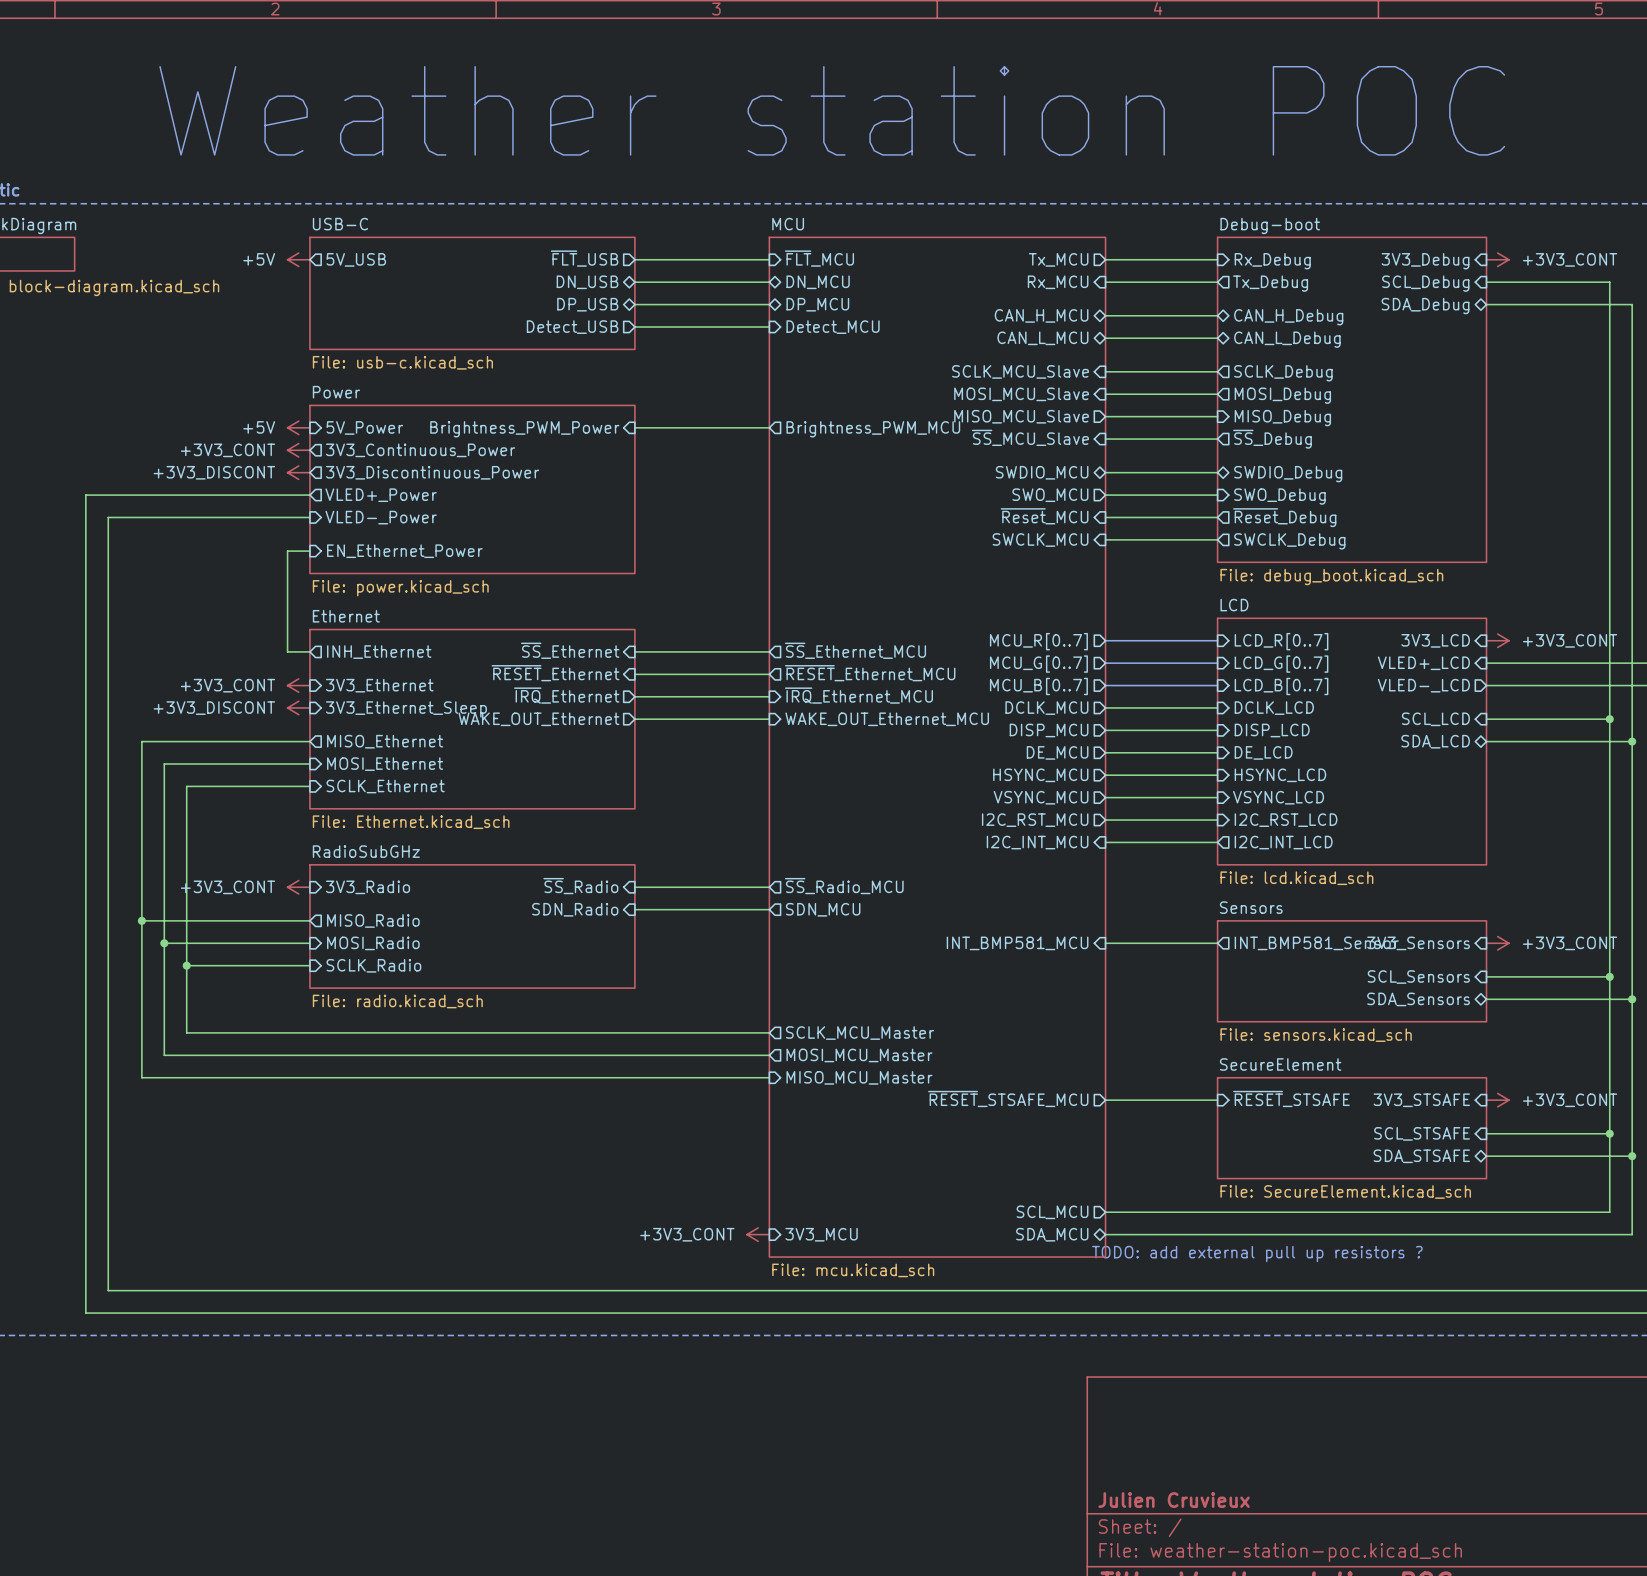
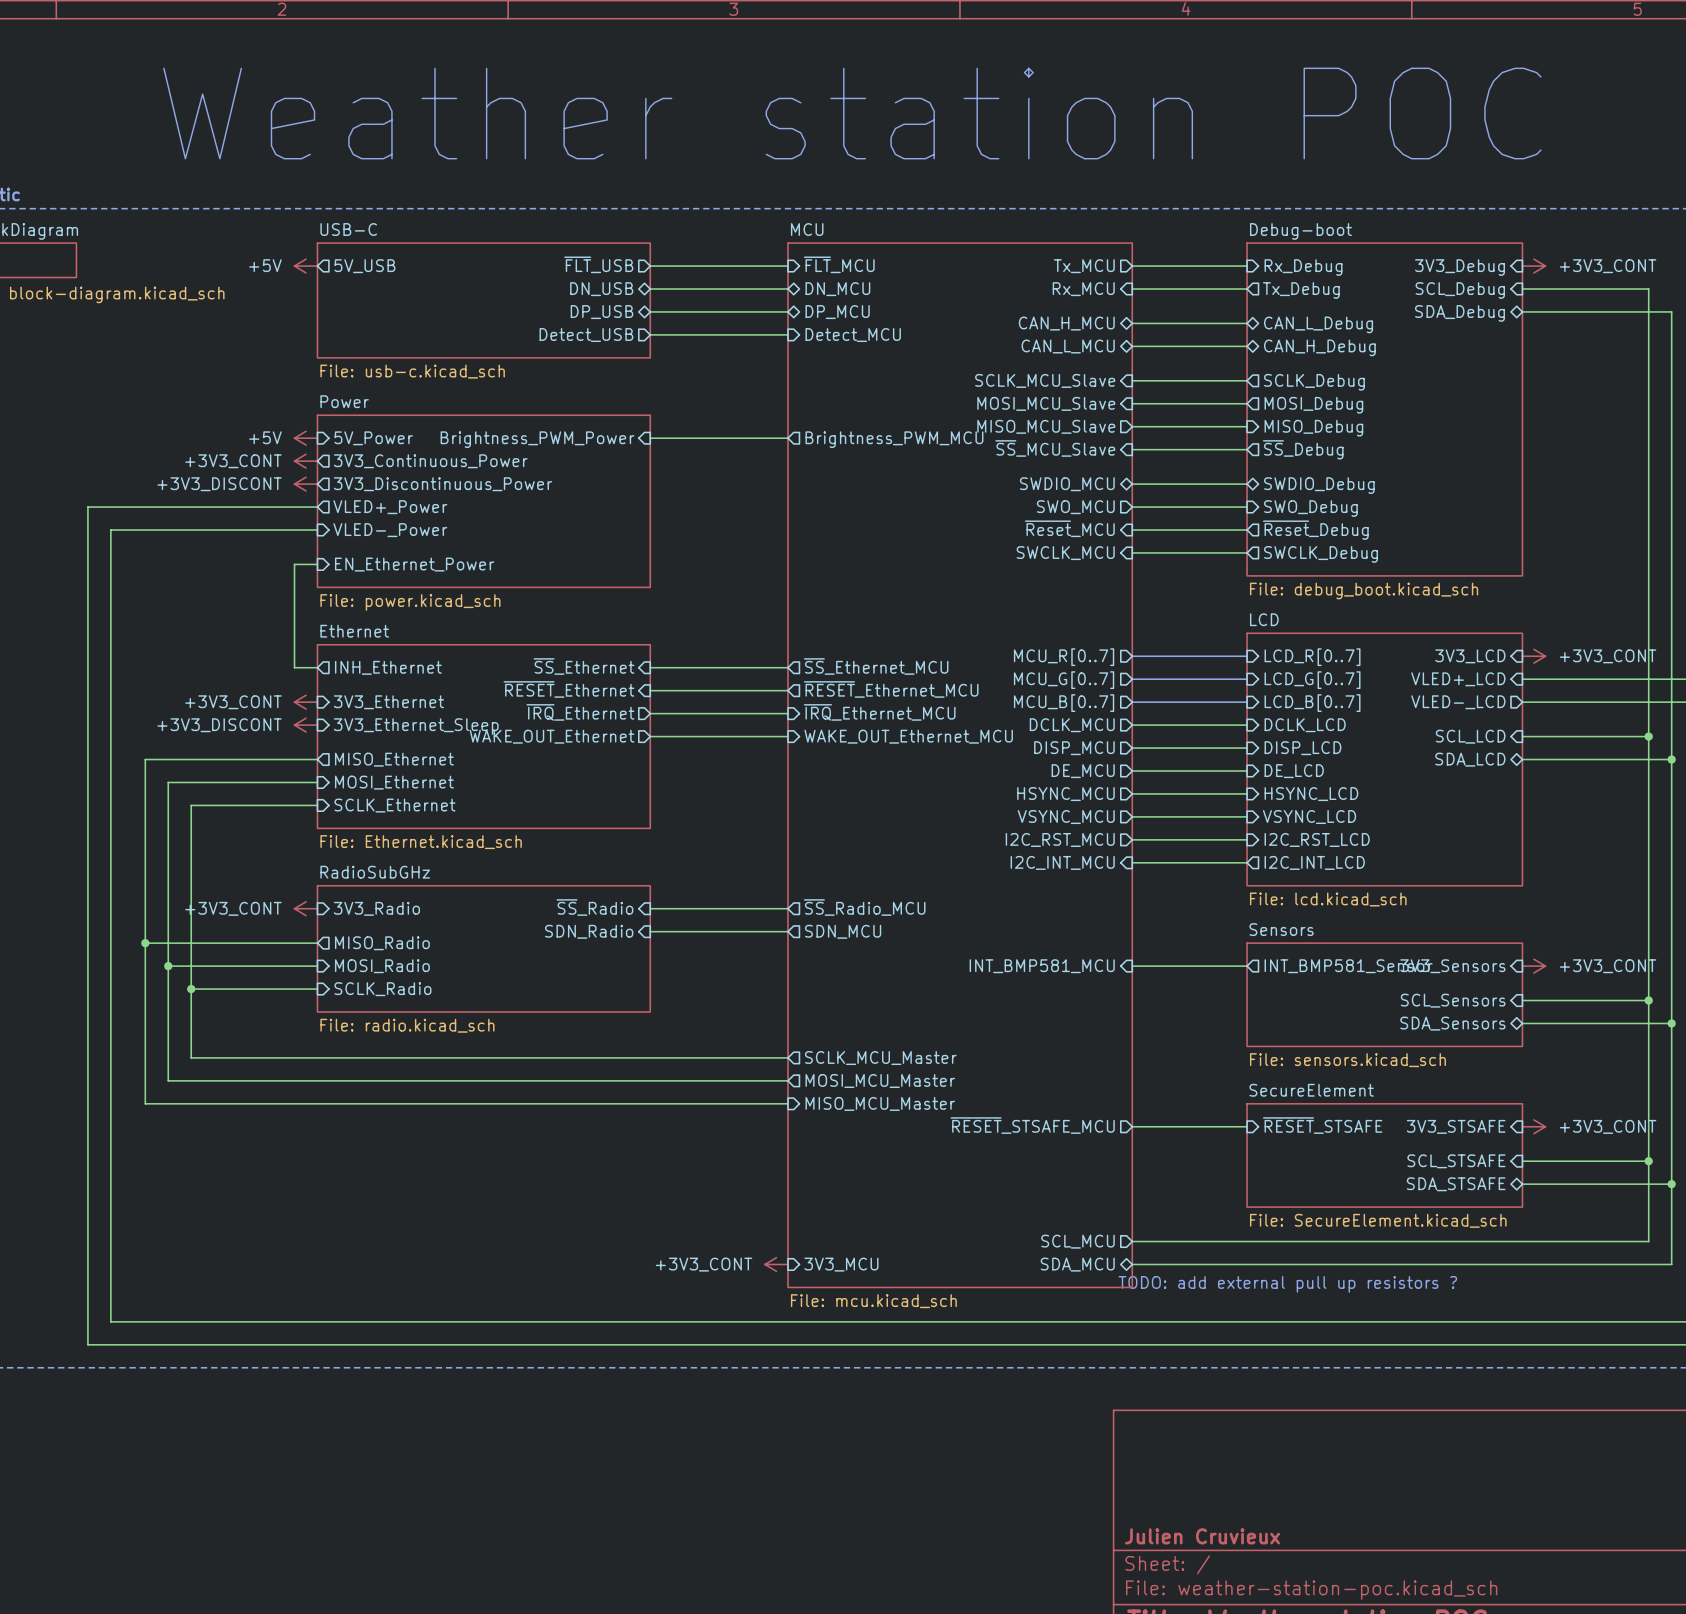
sheet pin: CAN_H_Debug (1288, 317) -> CAN_L_Debug (1318, 324)
sheet pin: CAN_L_Debug (1287, 339) -> CAN_H_Debug (1319, 347)

